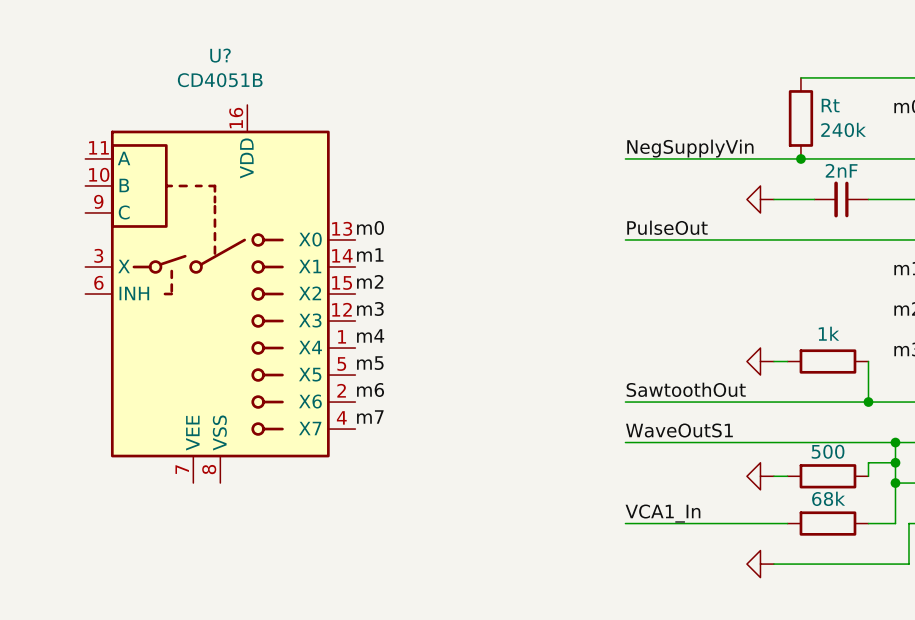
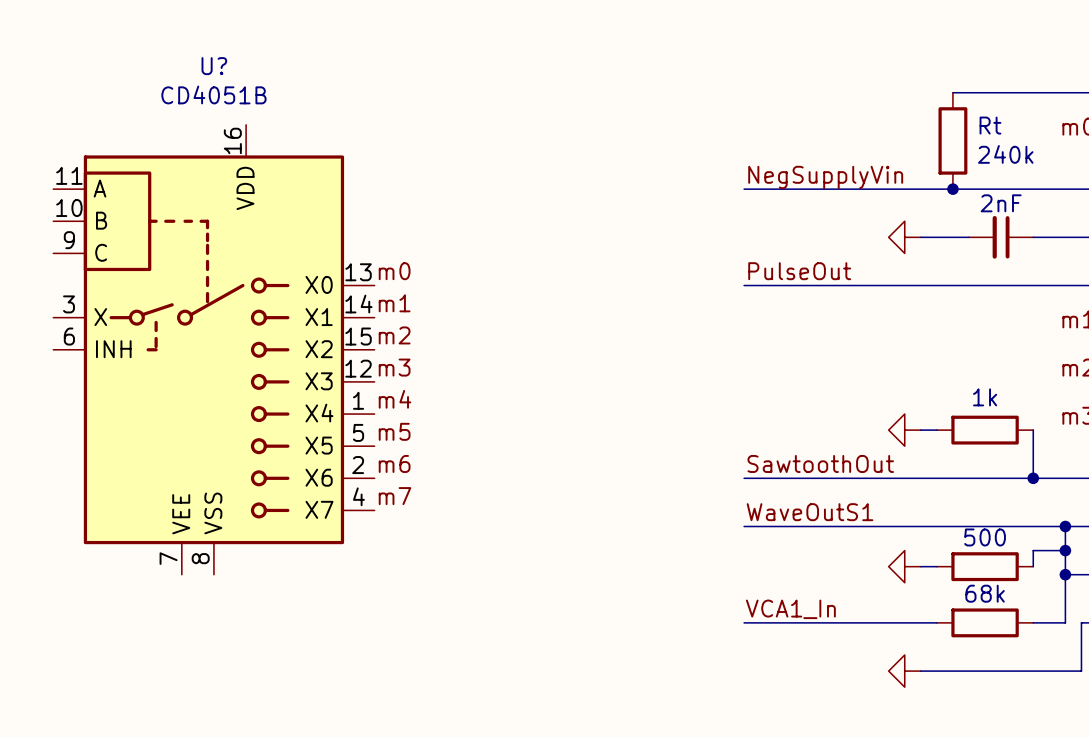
label position: m0 (370, 227) -> m0 (394, 271)
label position: m1 (370, 254) -> m1 (394, 303)
label position: m2 (370, 281) -> m2 (394, 335)
U? position: (220, 294) -> (213, 349)
label position: m3 (370, 308) -> m3 (394, 367)
label position: m4 (370, 335) -> m4 (395, 399)
label position: m5 (370, 363) -> m5 (394, 431)
label position: m6 (370, 389) -> m6 (394, 463)
label position: m7 (370, 416) -> m7 (395, 496)

